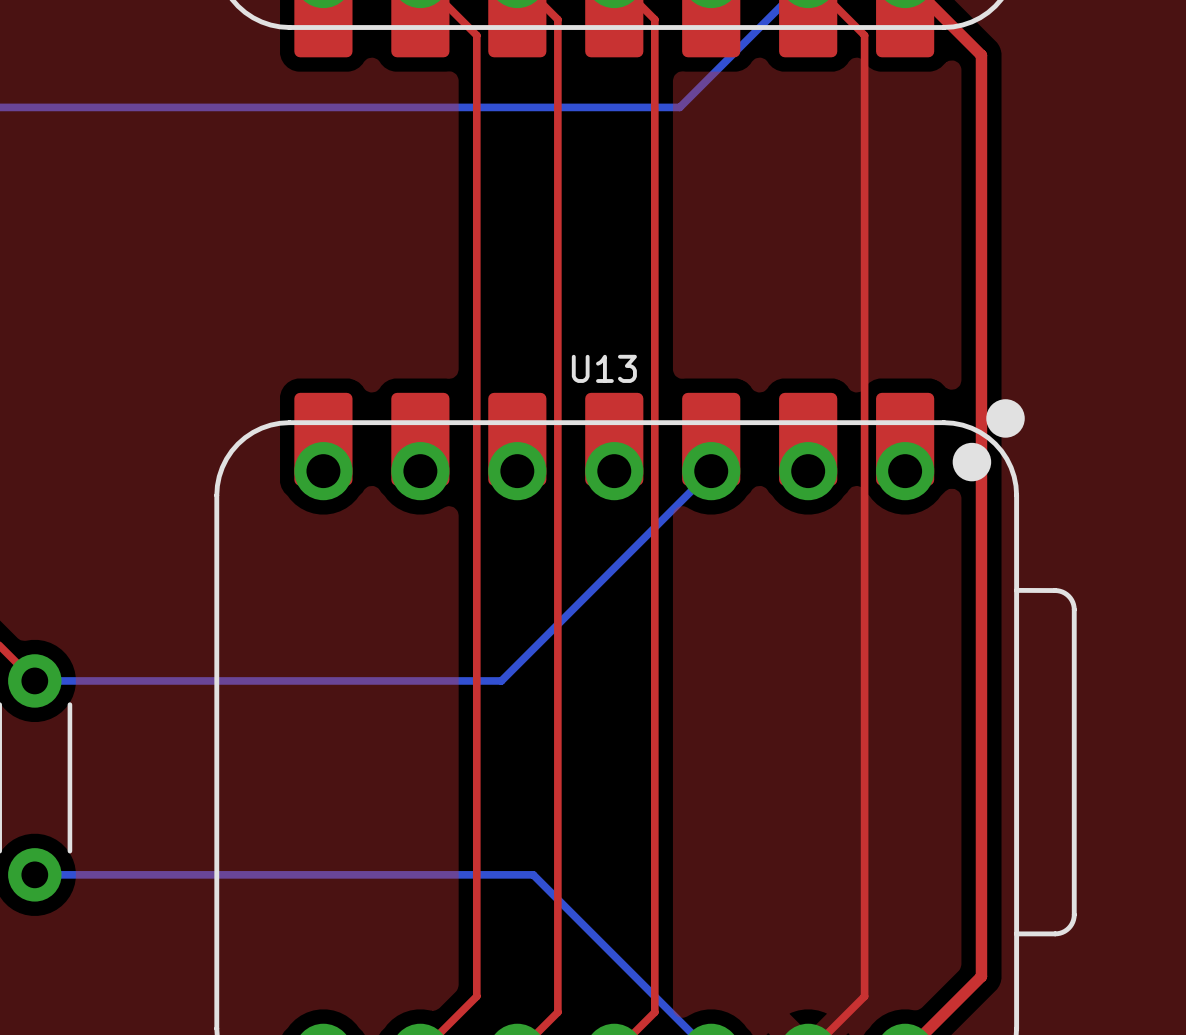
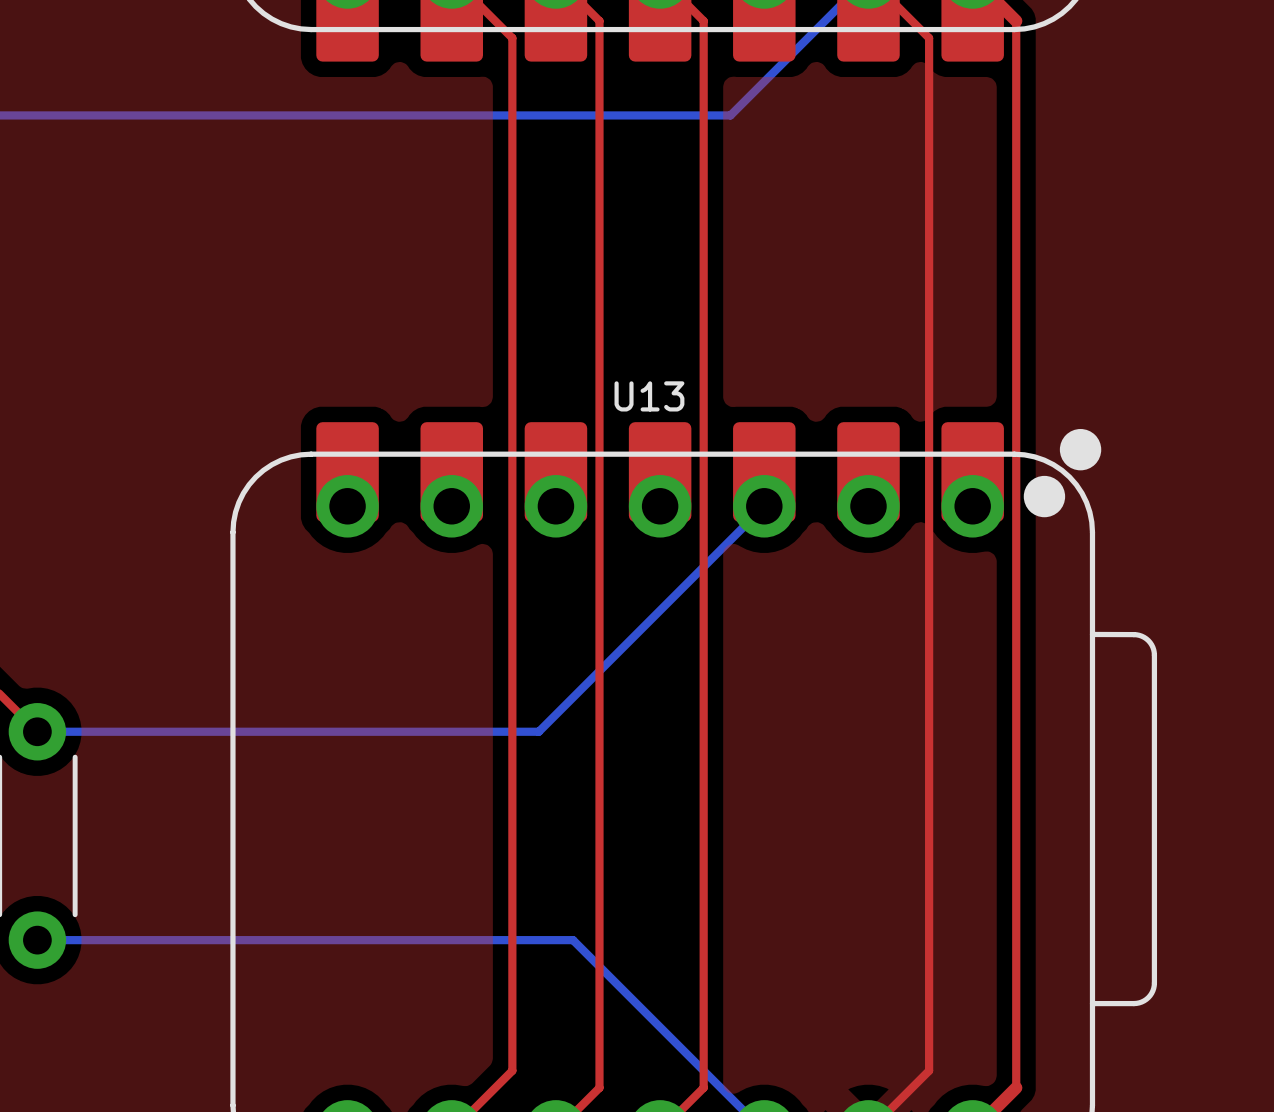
top track: (945, 19) (981, 55) (981, 976) (945, 1012) -> (1016, 21) (1016, 1087)

